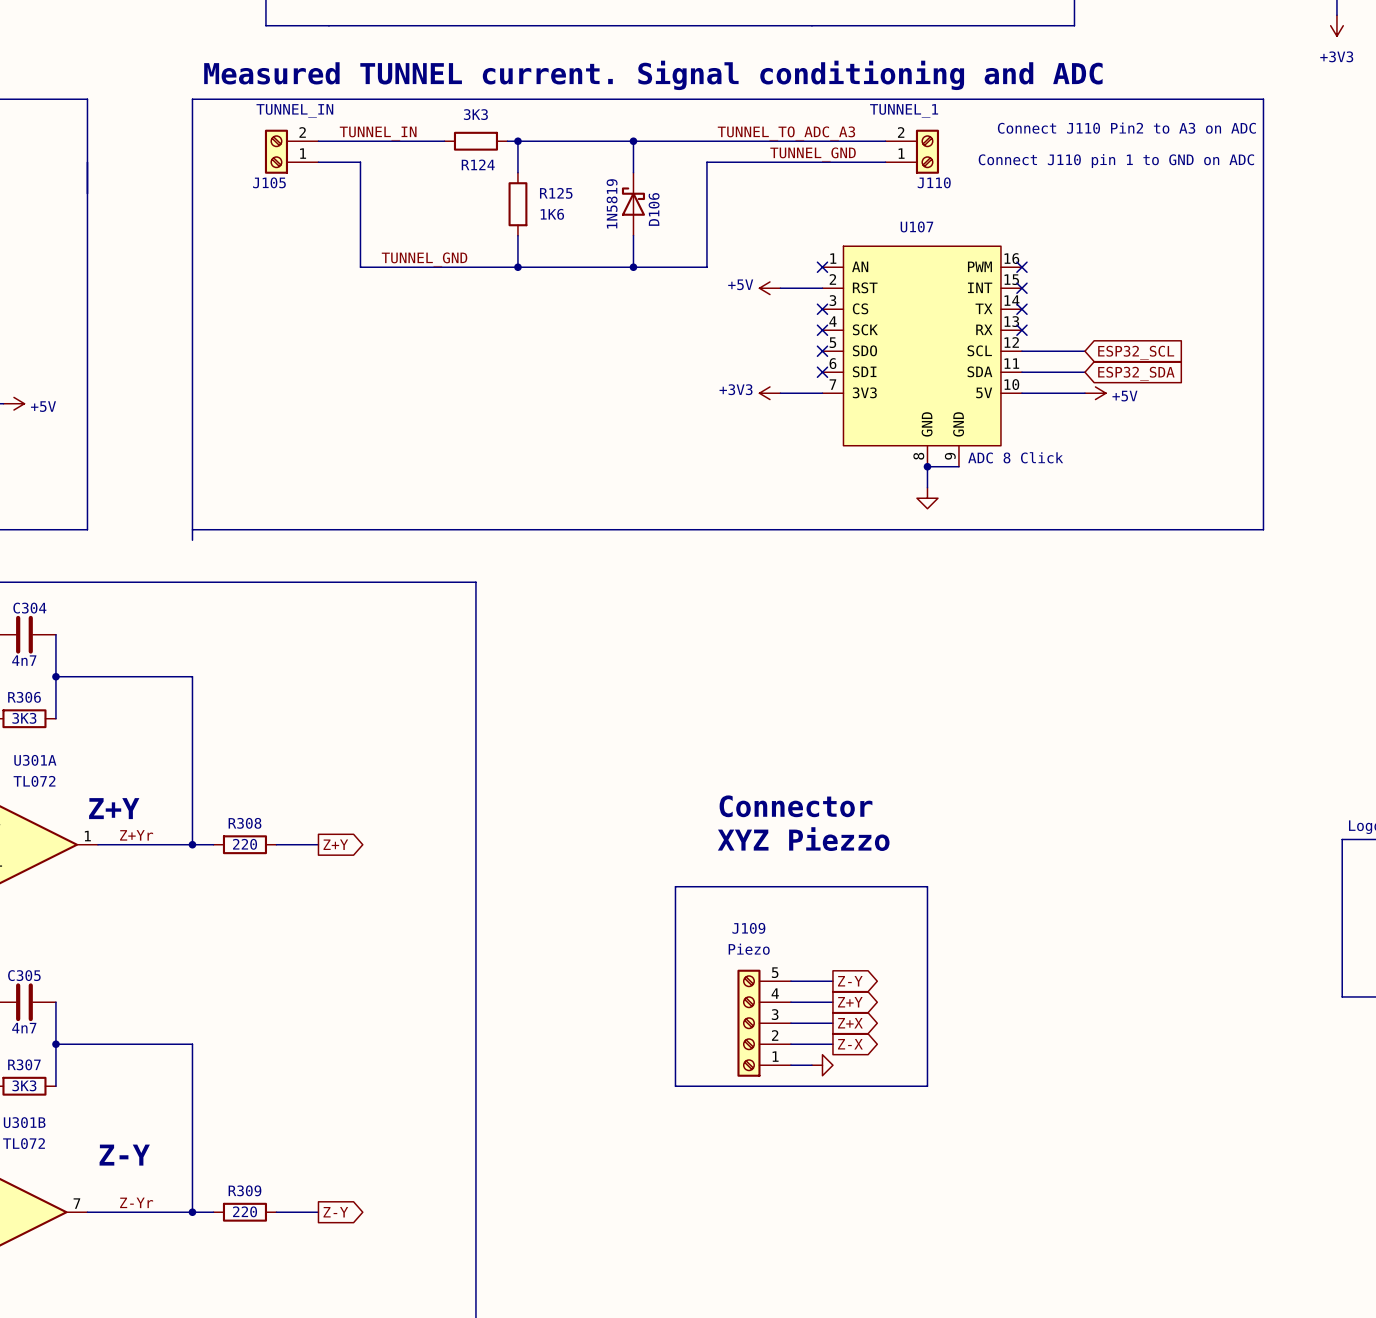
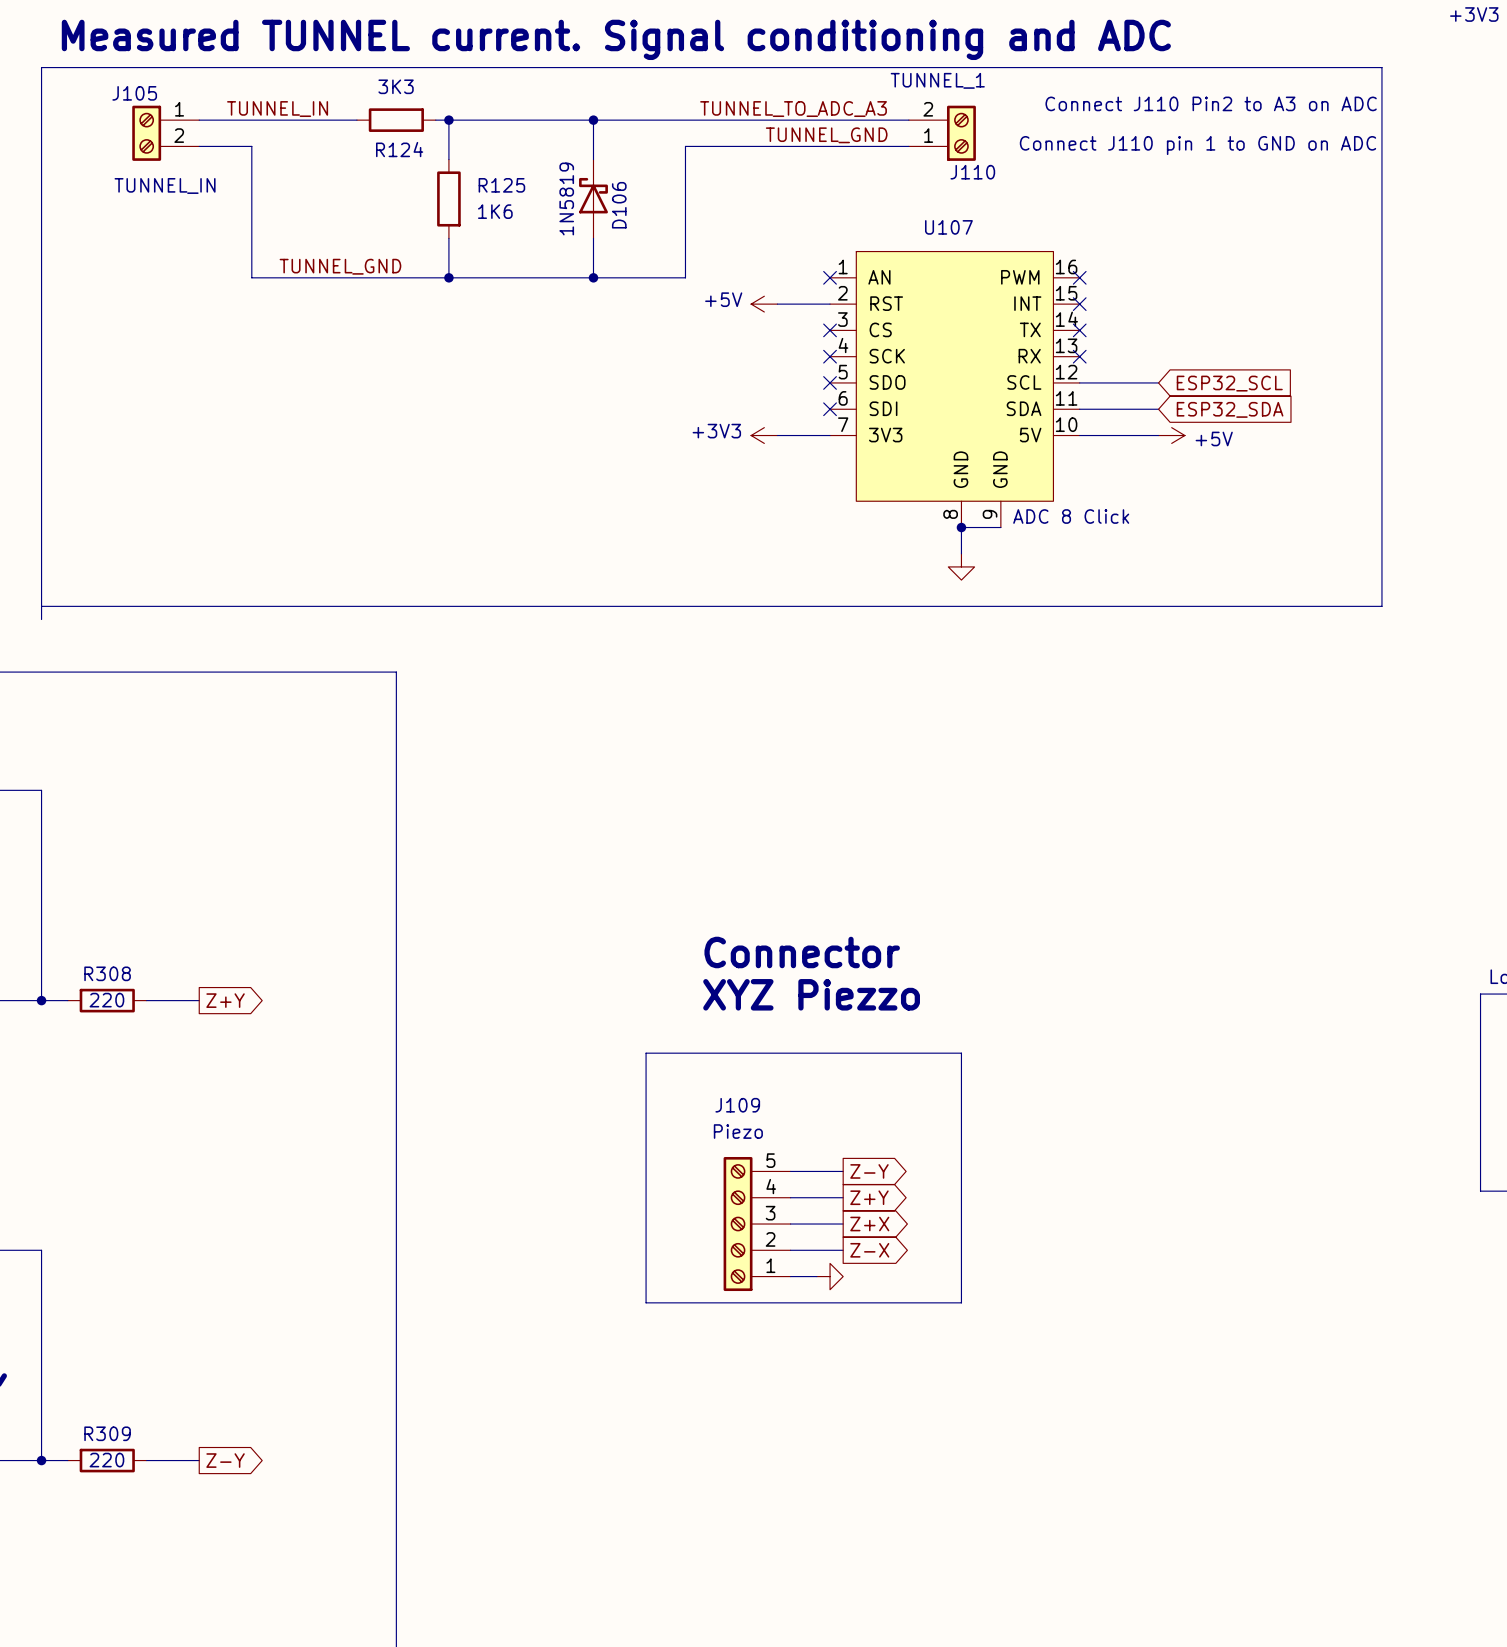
J105 flip: as is (276, 151) -> up-down (146, 133)

